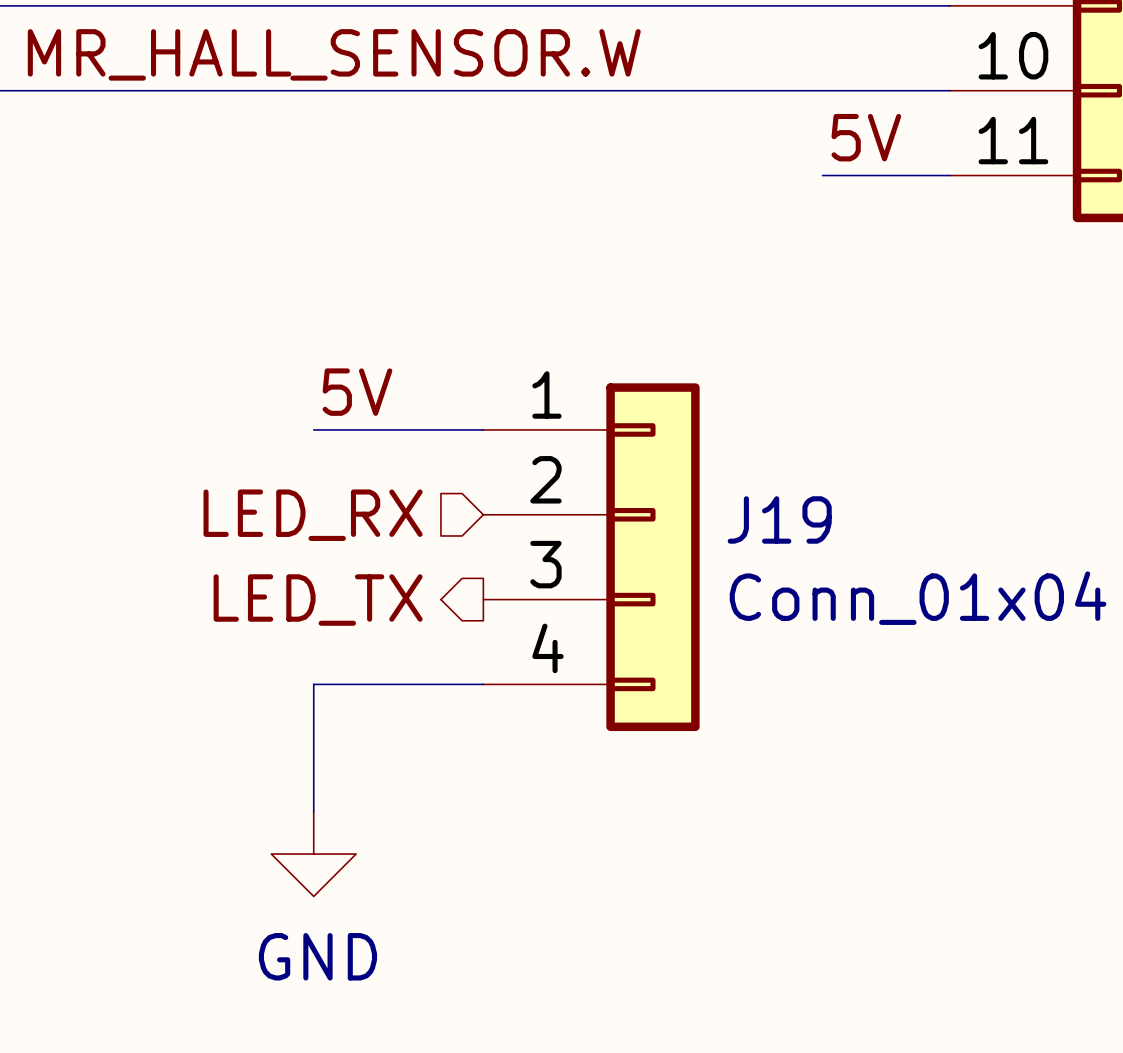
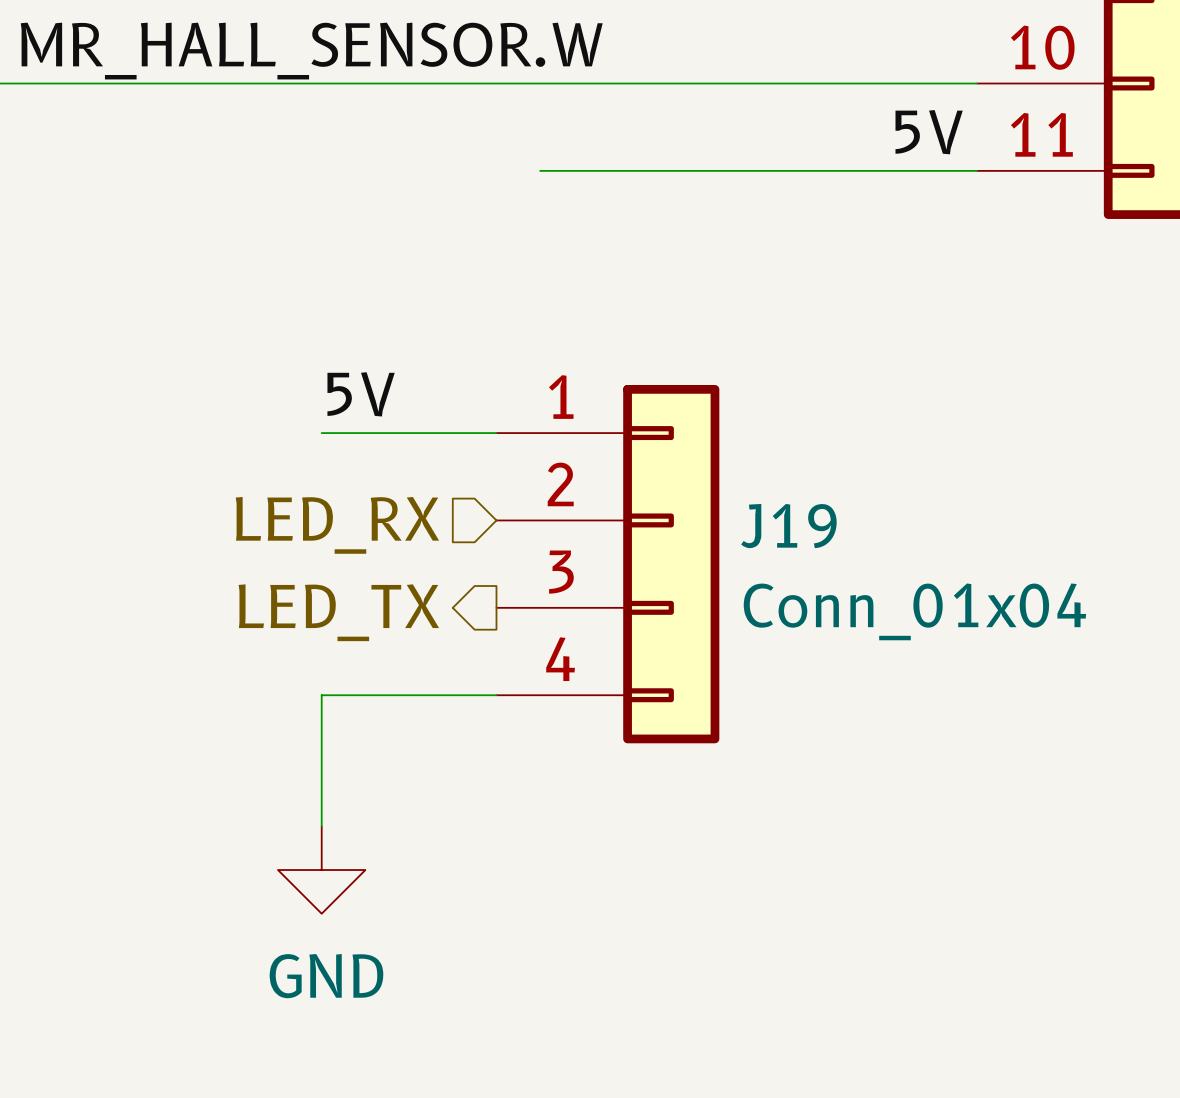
label position: 5V (866, 137) -> 5V (929, 132)
wire: none -> (540, 170) (846, 170)

